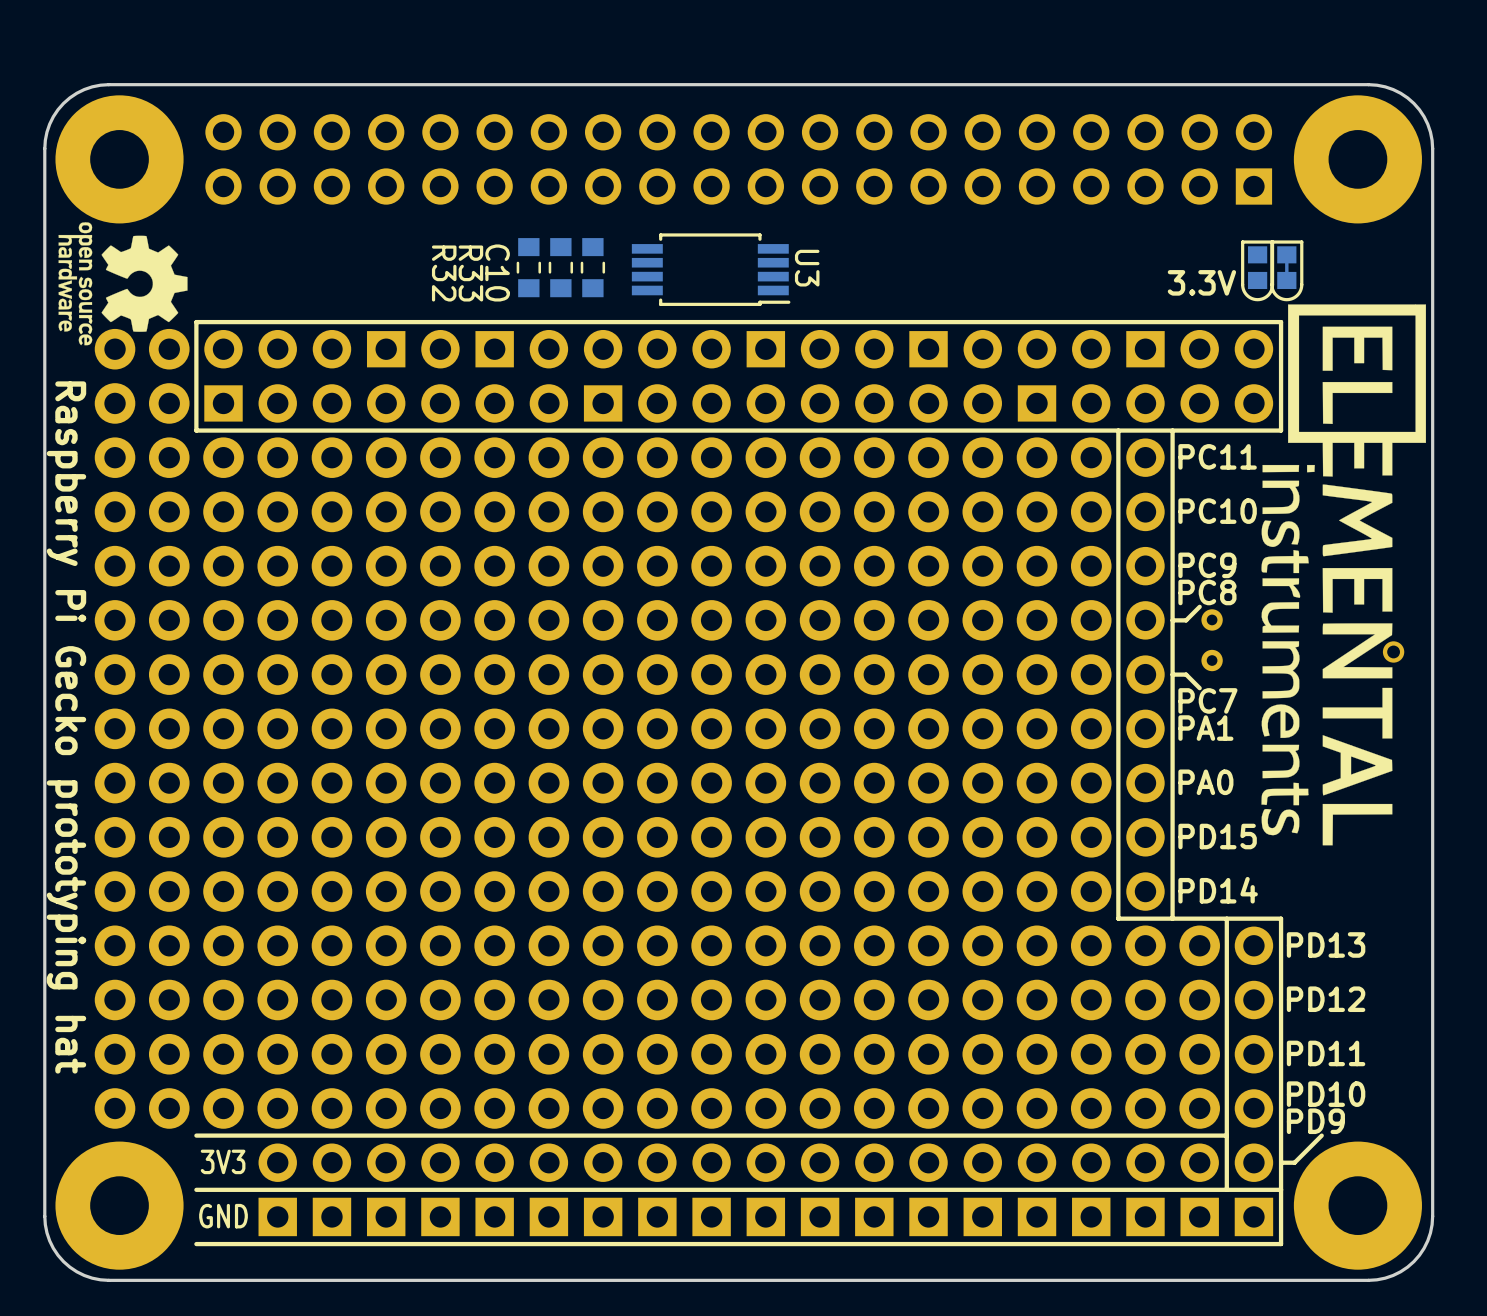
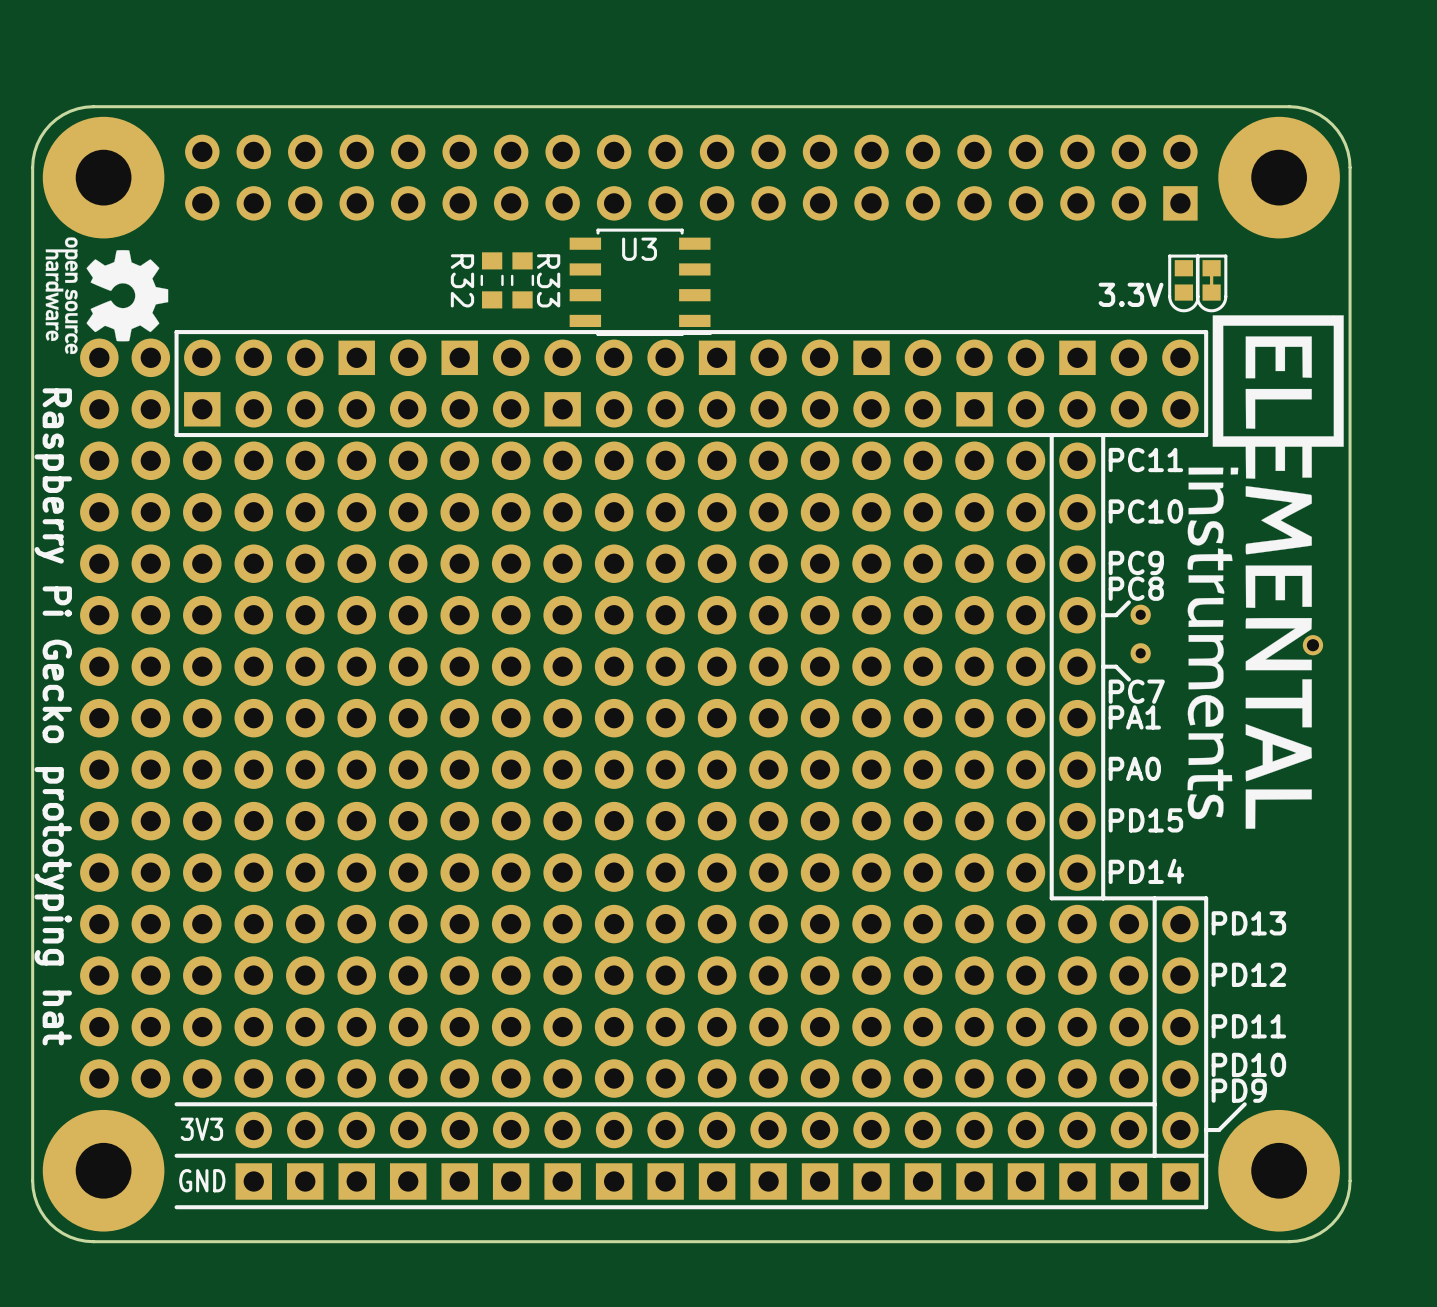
U3 footprint: [631, 233, 791, 306] -> [569, 228, 713, 337]
C10: (592, 267) -> none
U3 name position: U3 (807, 268) -> U3 (639, 249)
R32 name position: R32 (444, 273) -> R32 (462, 280)
R33 name position: R33 (470, 273) -> R33 (548, 280)

